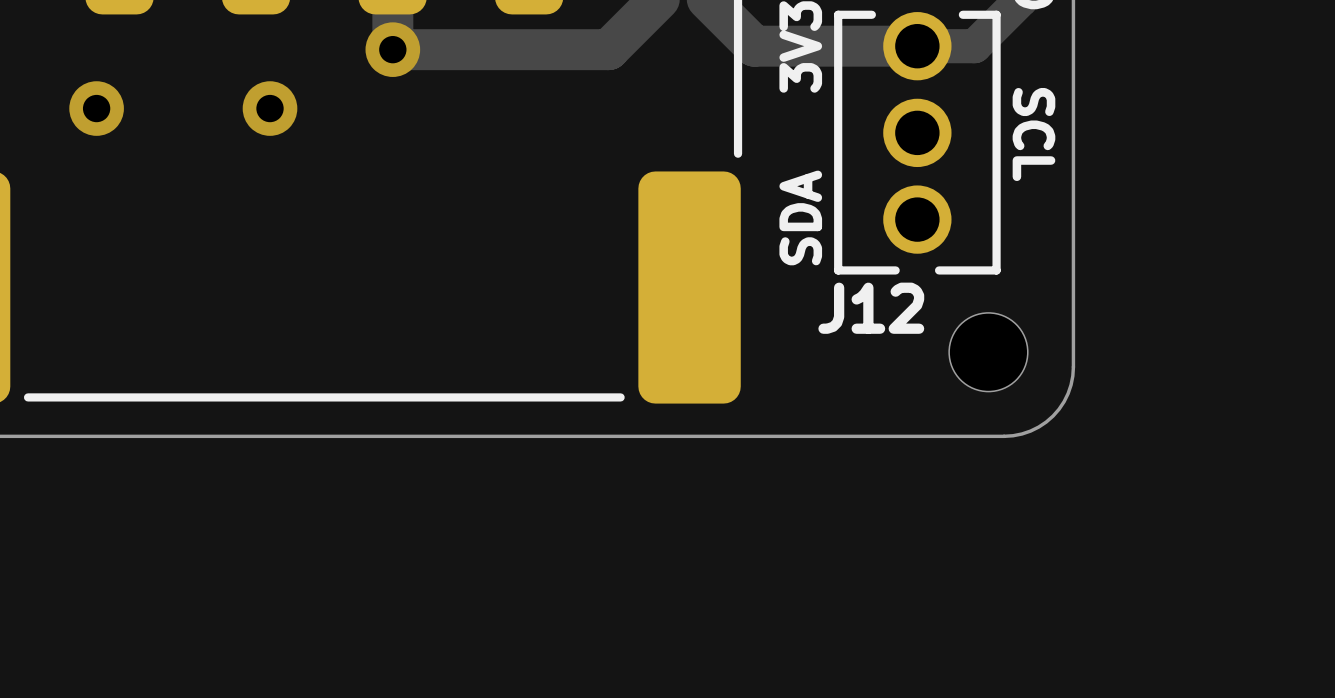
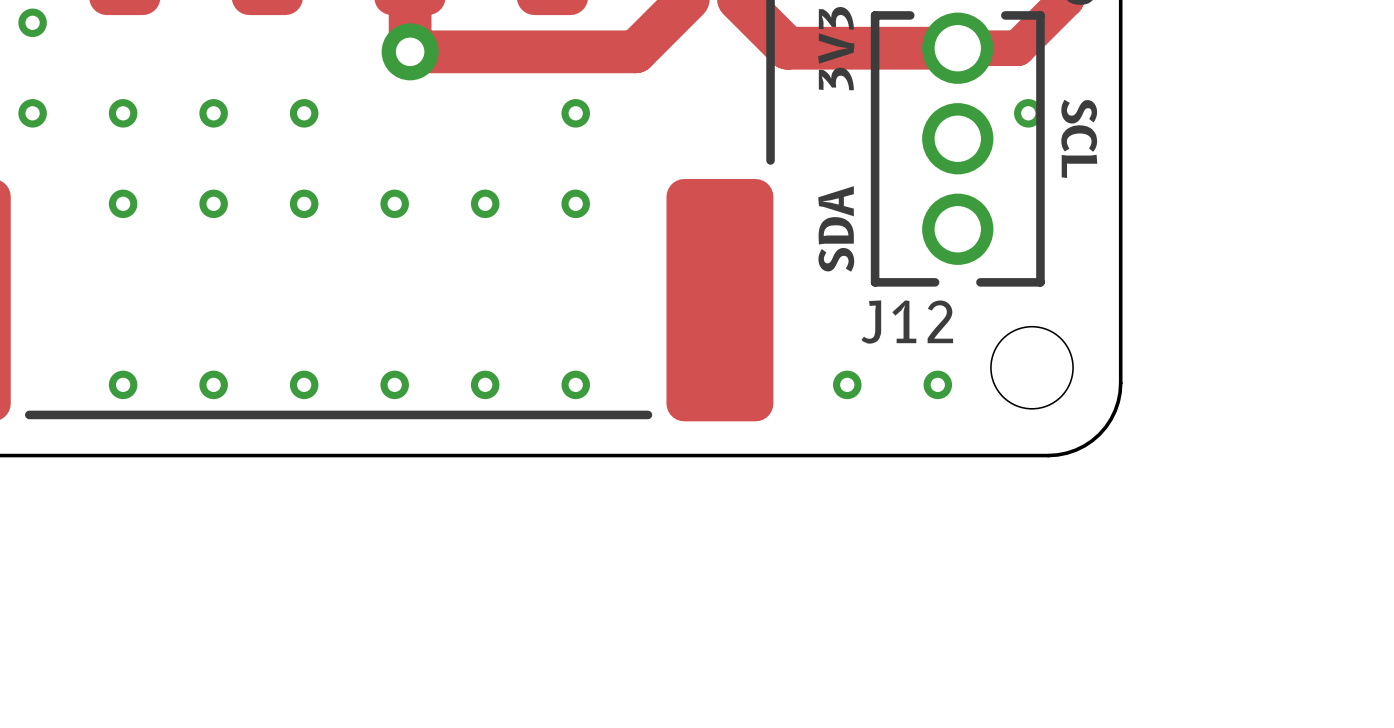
via: none -> (32, 22)
via size: [69, 81, 124, 136] -> [108, 99, 138, 128]
via size: [242, 81, 298, 136] -> [289, 99, 319, 128]
via: none -> (32, 113)
via: none -> (213, 113)
via: none -> (575, 113)
via: none -> (1028, 113)
via: none -> (123, 203)
via: none -> (213, 203)
via: none -> (304, 203)
via: none -> (394, 203)
via: none -> (485, 203)
via: none -> (575, 203)
via: none -> (123, 384)
via: none -> (213, 384)
via: none -> (304, 384)
via: none -> (394, 384)
via: none -> (485, 384)
via: none -> (575, 384)
via: none -> (847, 384)
via: none -> (937, 384)

